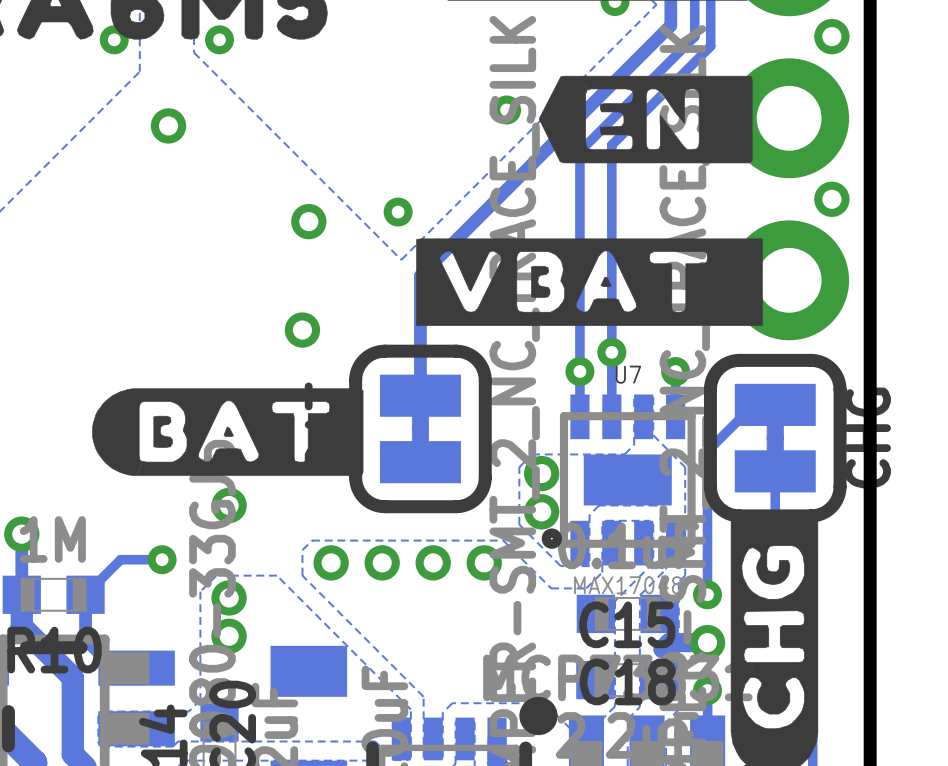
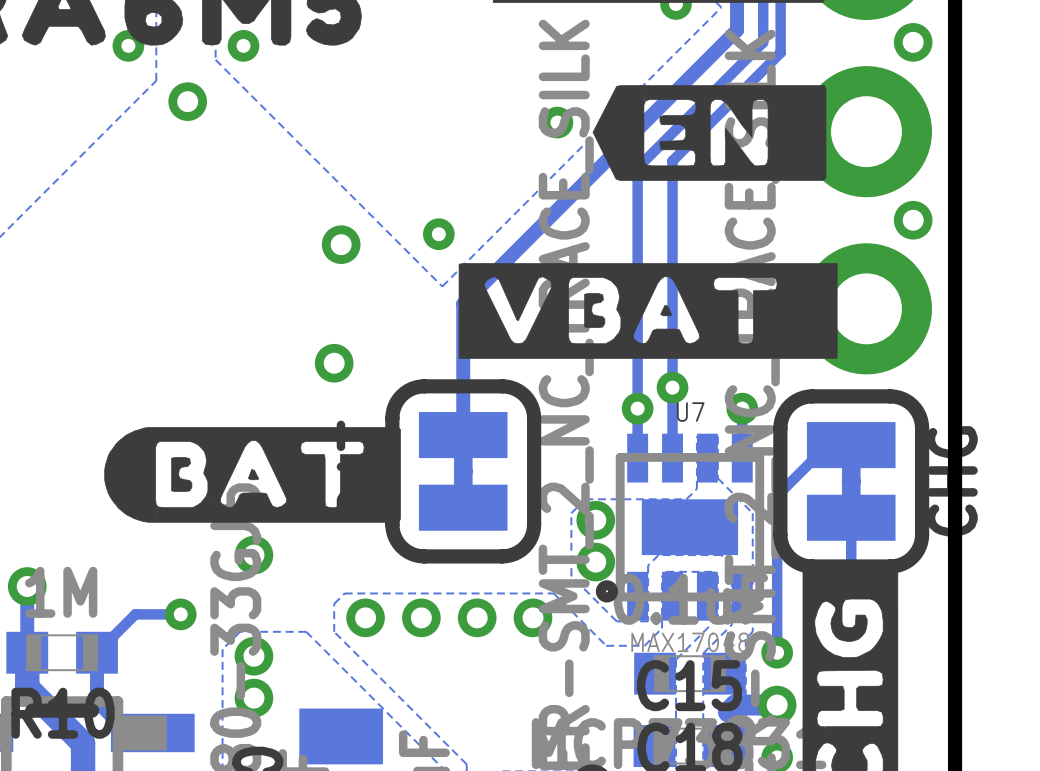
via position: (168, 125) -> (187, 101)

